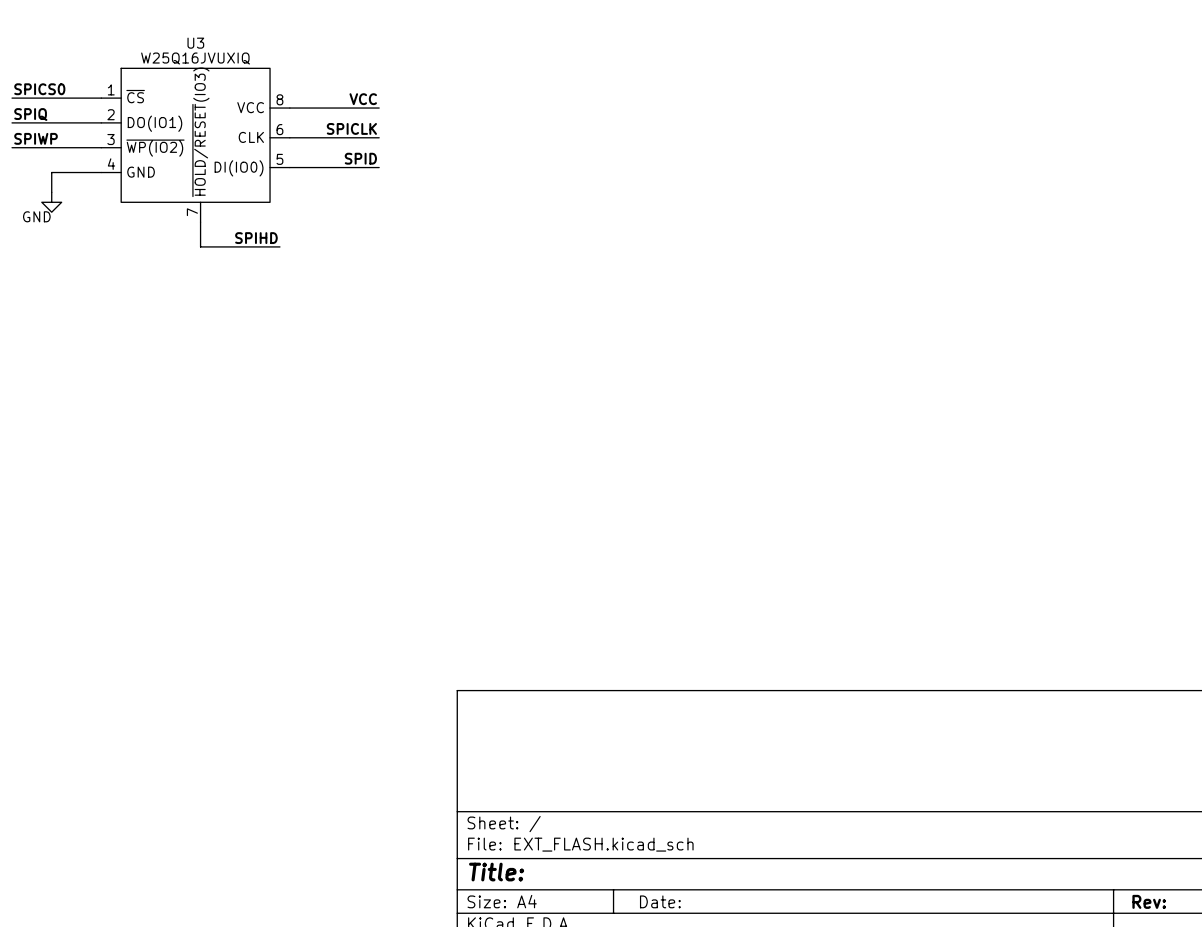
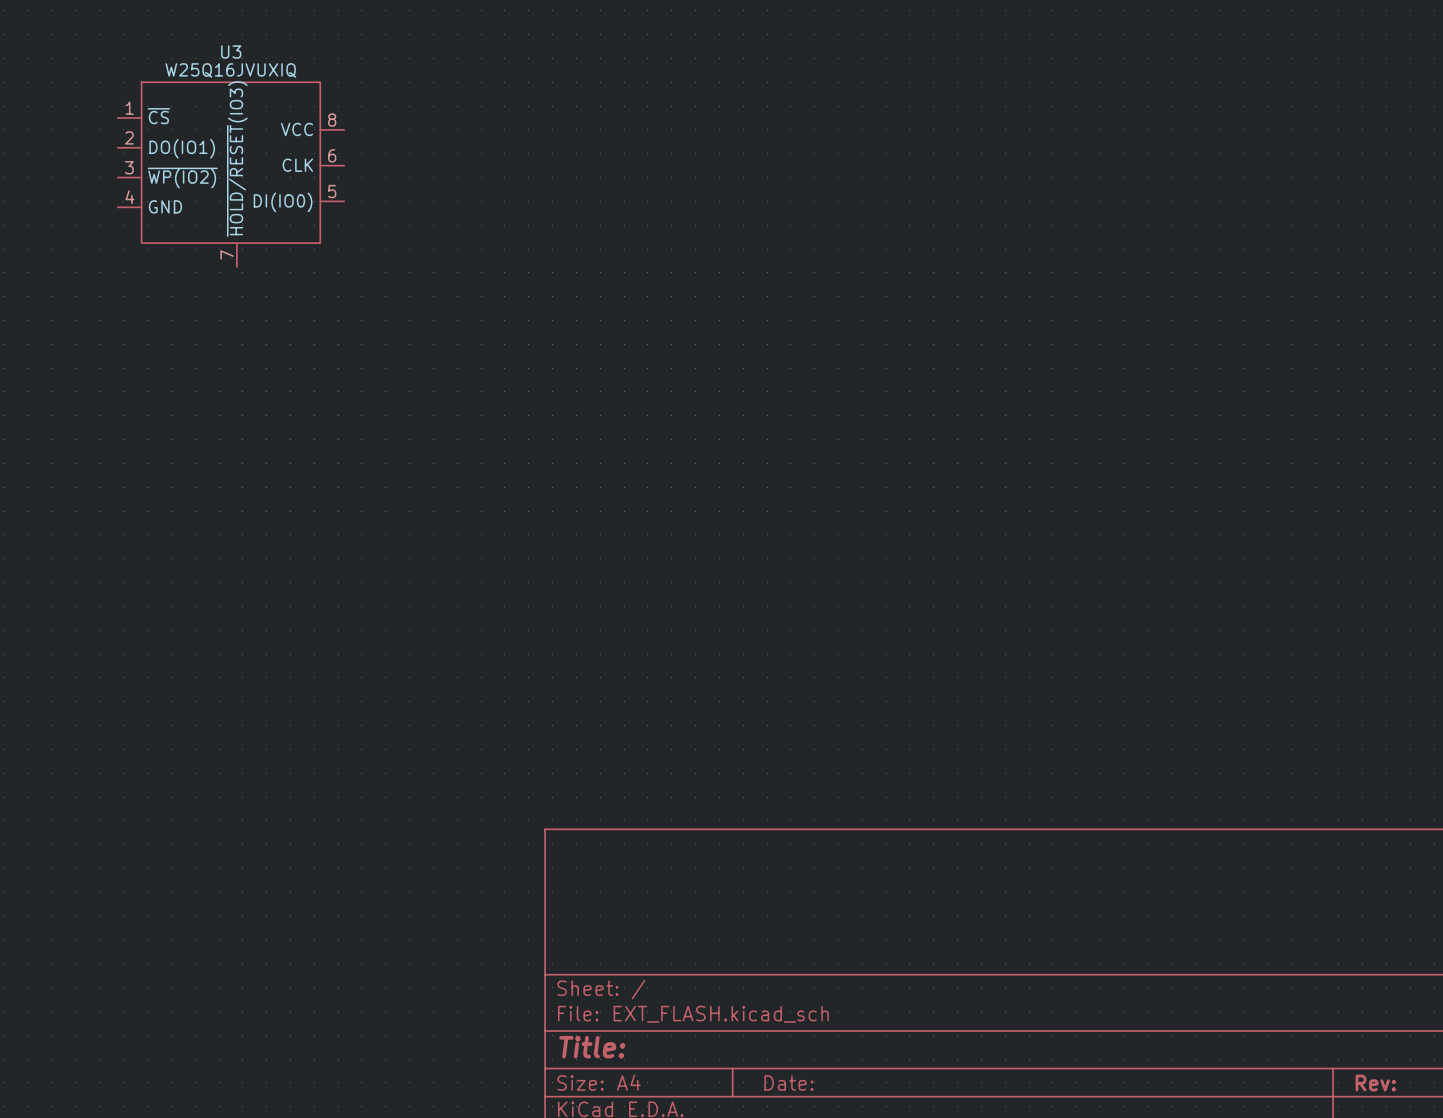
label: SPICS0 (39, 89) -> none
wire: (12, 98) (101, 98) -> none
label: VCC (363, 99) -> none
wire: (289, 108) (379, 108) -> none
label: SPIQ (30, 114) -> none
wire: (12, 122) (101, 122) -> none
label: SPICLK (351, 128) -> none
wire: (289, 137) (379, 137) -> none
label: SPIWP (36, 138) -> none
wire: (12, 147) (101, 147) -> none
label: SPID (360, 158) -> none
wire: (289, 167) (379, 167) -> none
wire: (101, 172) (51, 172) (51, 192) -> none
power symbol: GND (51, 202) -> none
wire: (200, 222) (200, 246) (279, 246) -> none
label: SPIHD (256, 238) -> none

